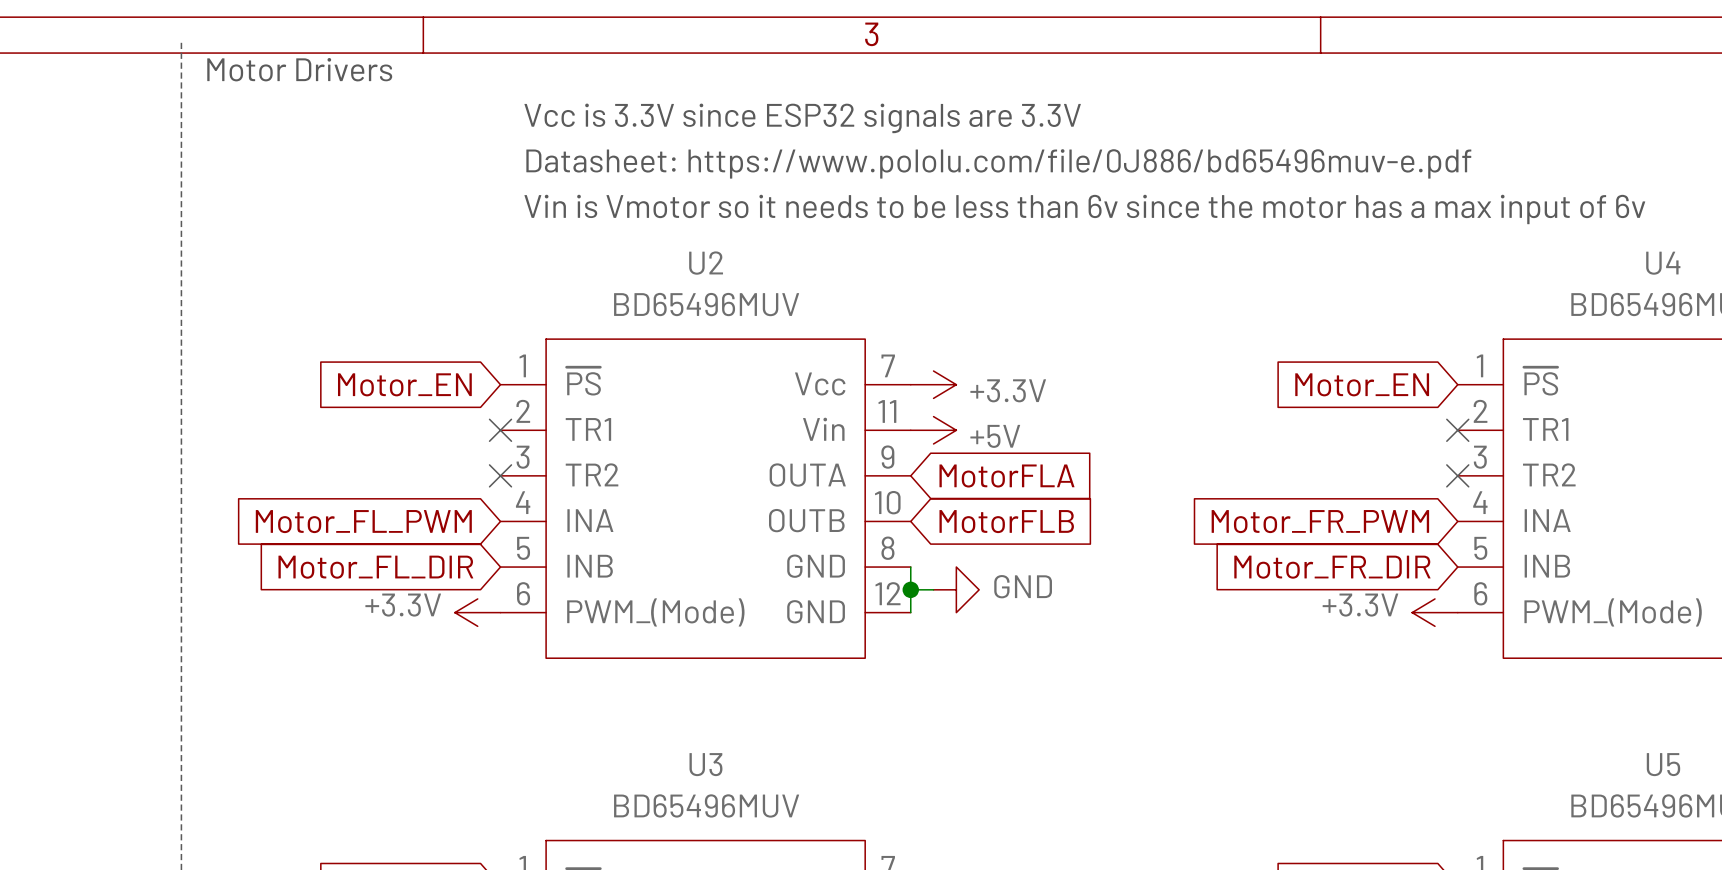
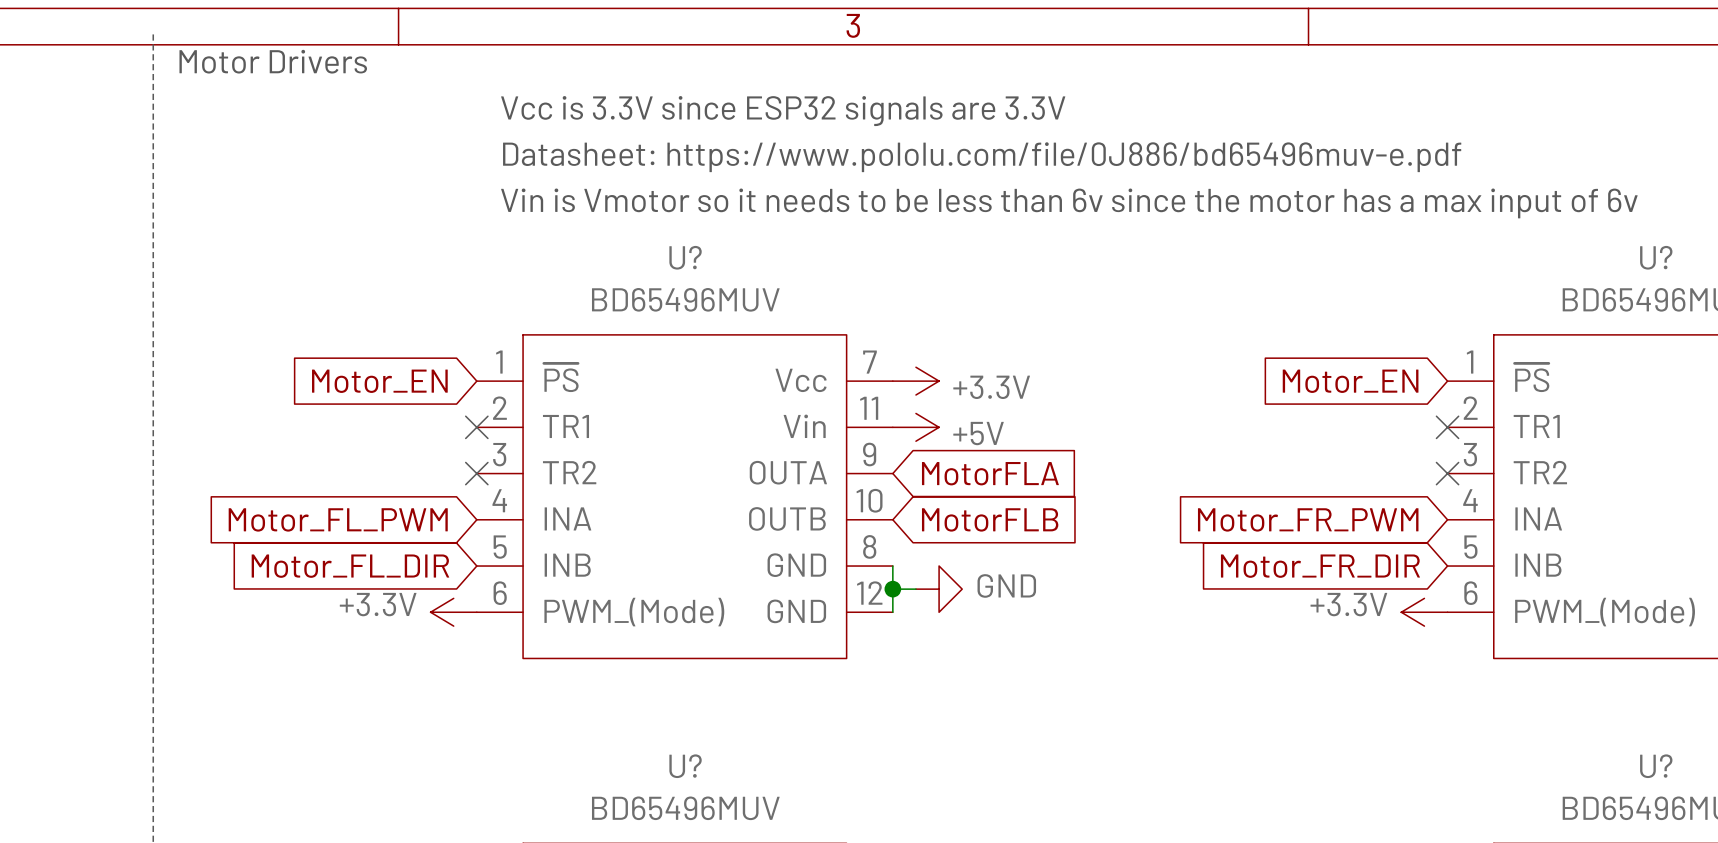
U2 name: U2 (706, 263) -> U? (685, 257)
U4 name: U4 (1663, 263) -> U? (1656, 257)
U3 name: U3 (705, 764) -> U? (685, 766)
U5 name: U5 (1663, 764) -> U? (1656, 766)

